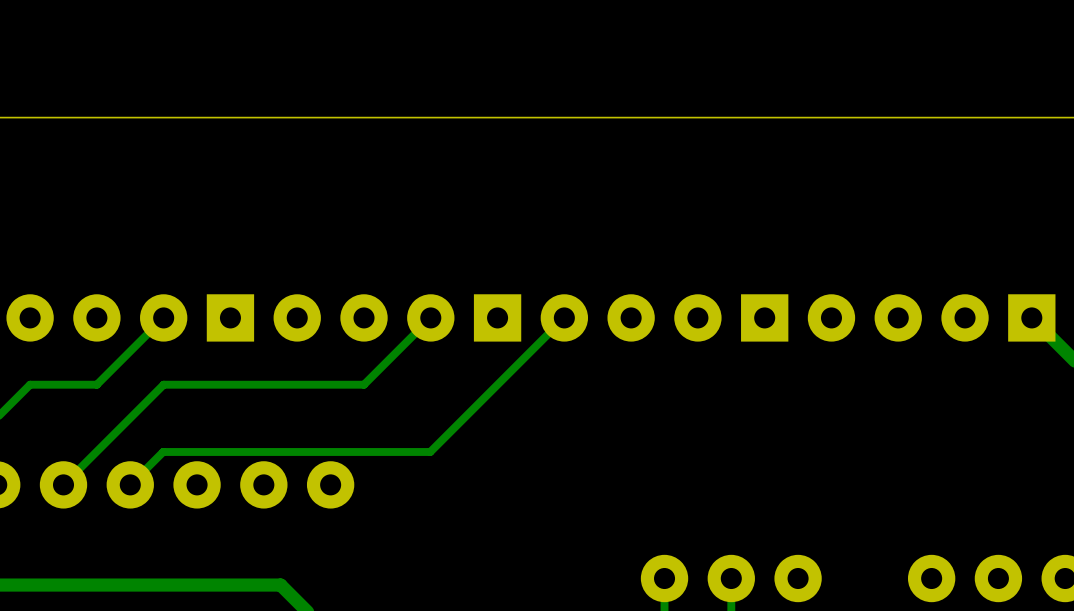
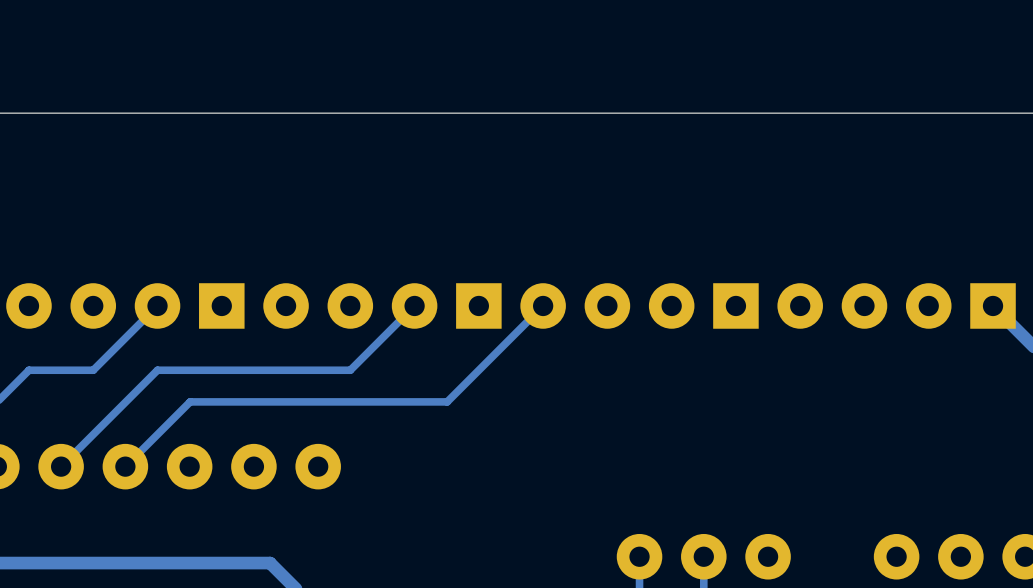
track: (464, 417) (430, 451) (163, 451) -> (447, 401) (190, 401) (157, 434)

